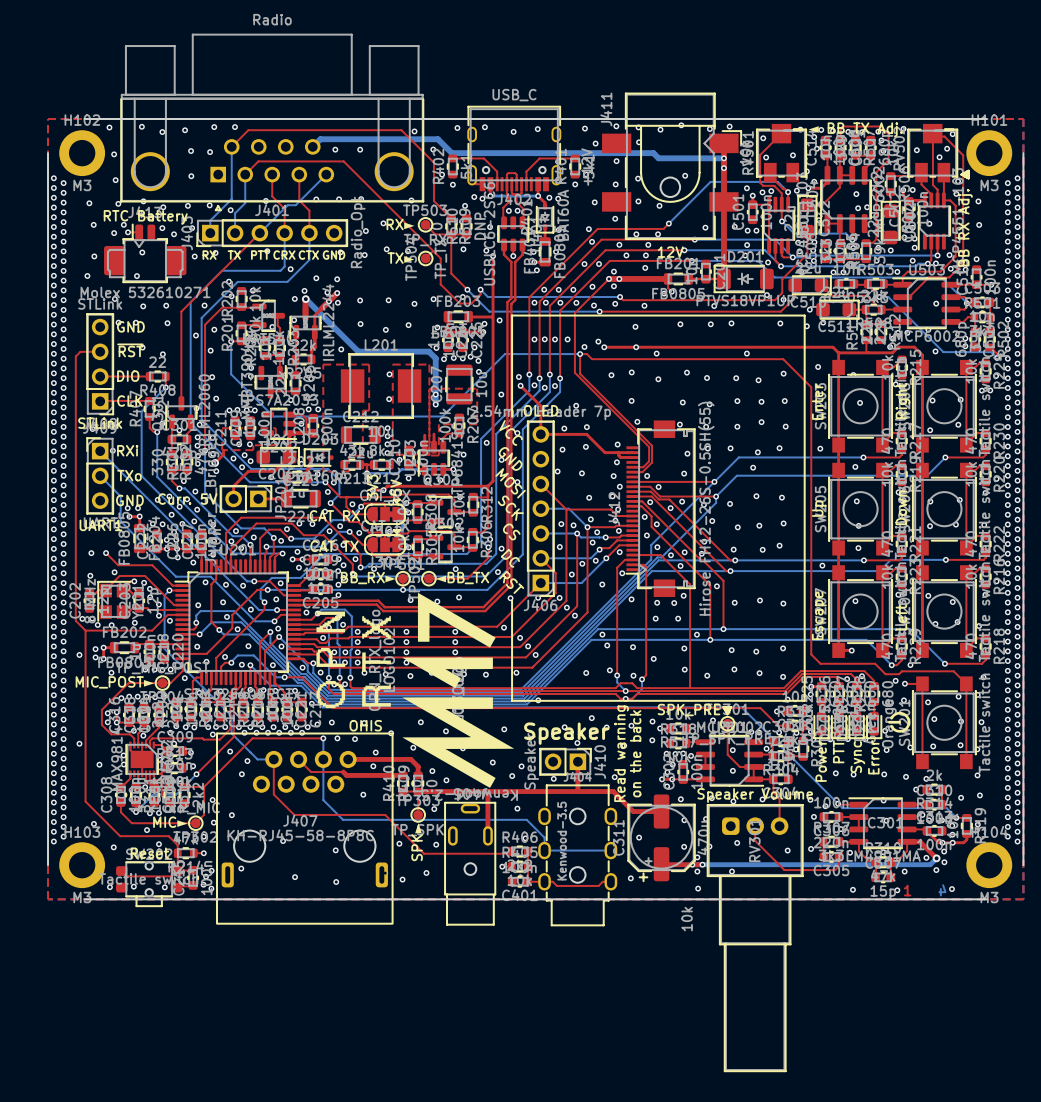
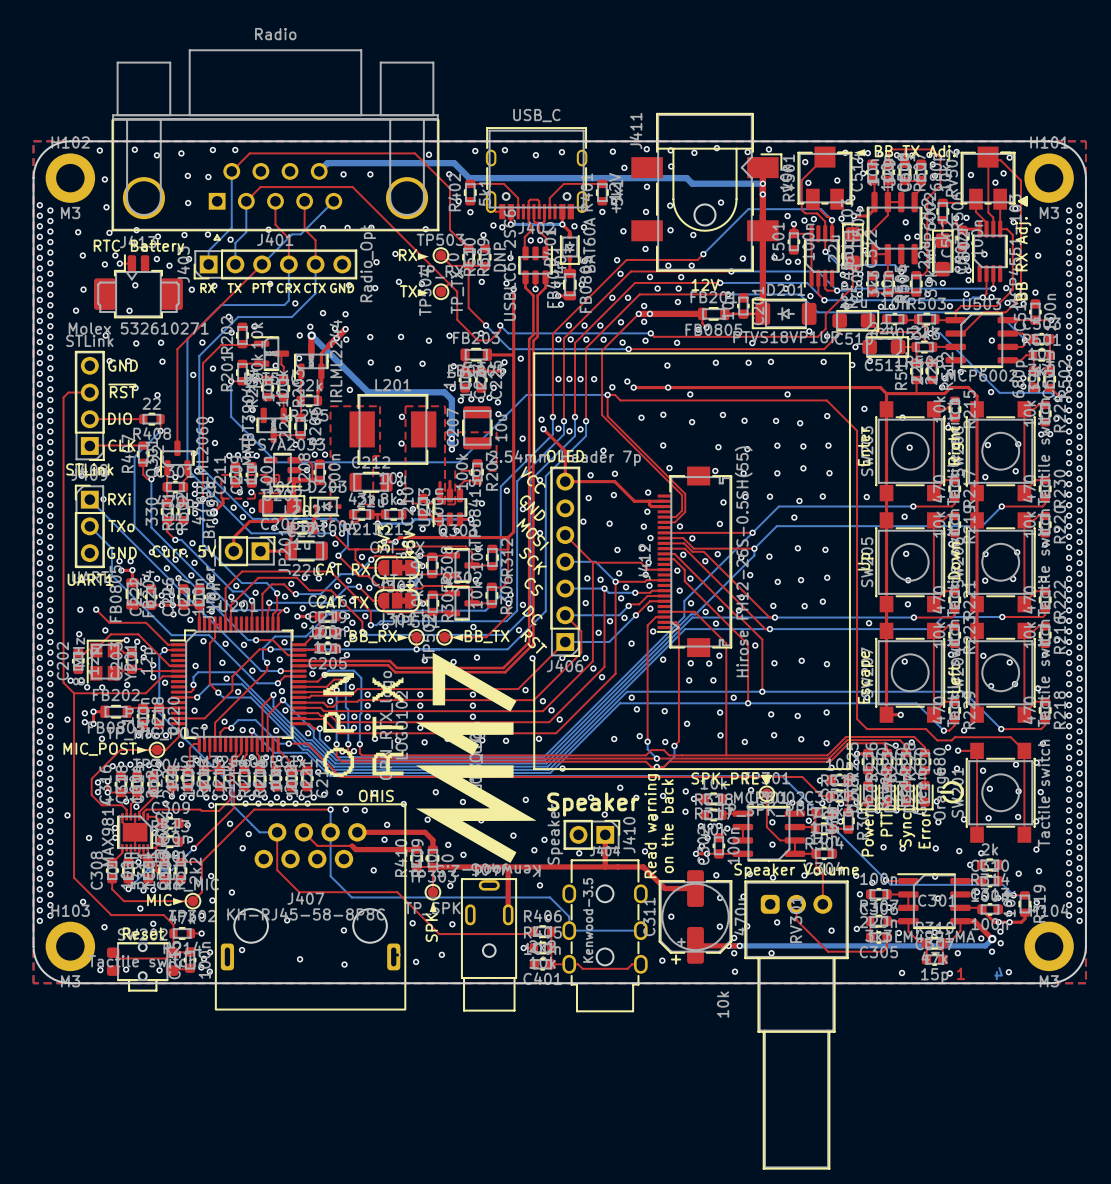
board edge: none -> (73, 141) (58, 143) (44, 152) (35, 165) (33, 178)
board edge: none -> (1046, 141) (1061, 143) (1075, 152) (1082, 162) (1085, 178)
board edge: none -> (33, 946) (35, 958) (44, 972) (58, 981) (73, 983)
board edge: none -> (1085, 946) (1083, 958) (1075, 972) (1061, 981) (1046, 983)

